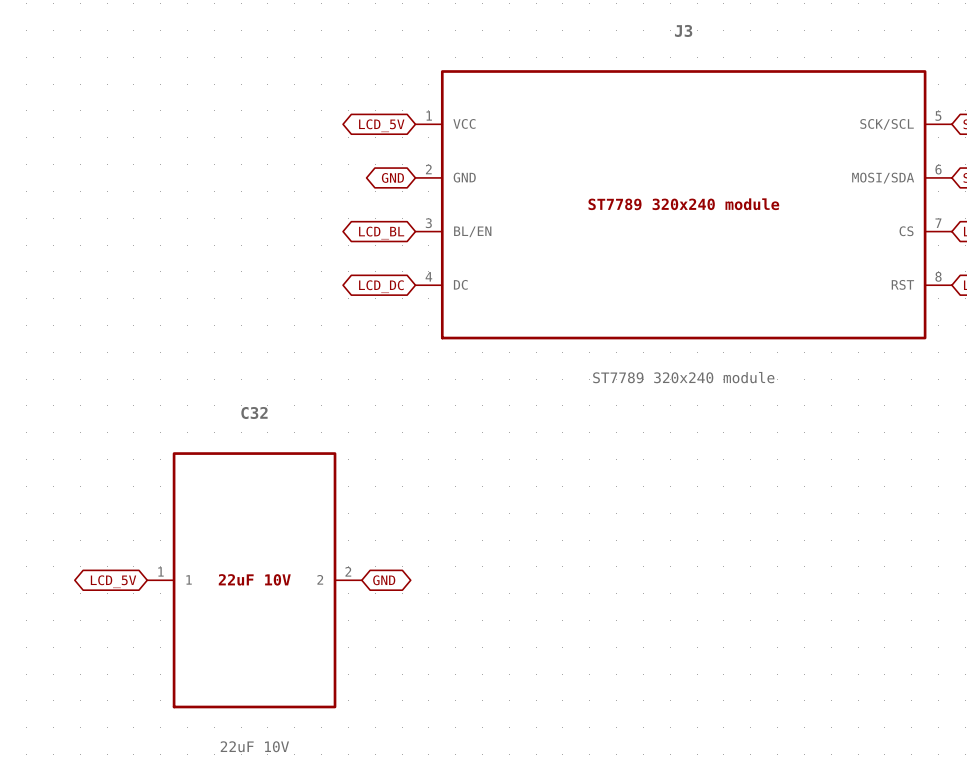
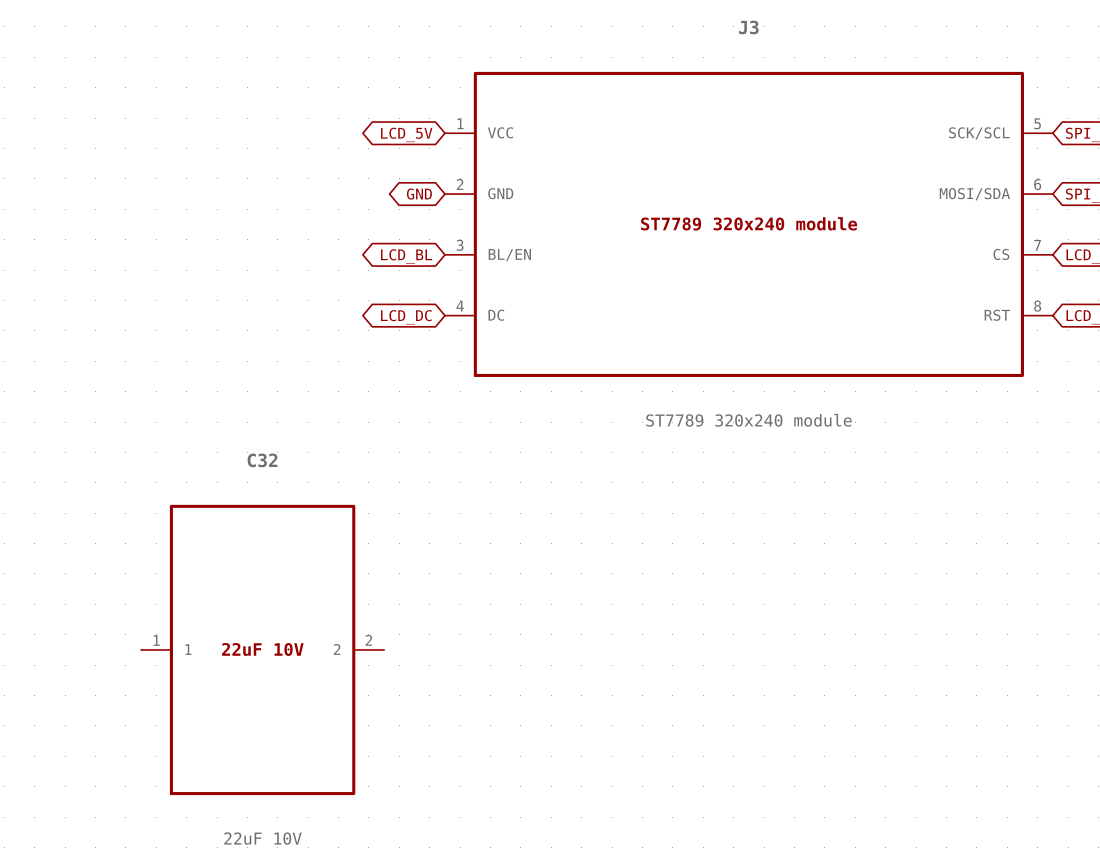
global label: GND (384, 580) -> none
global label: LCD_5V (113, 581) -> none

